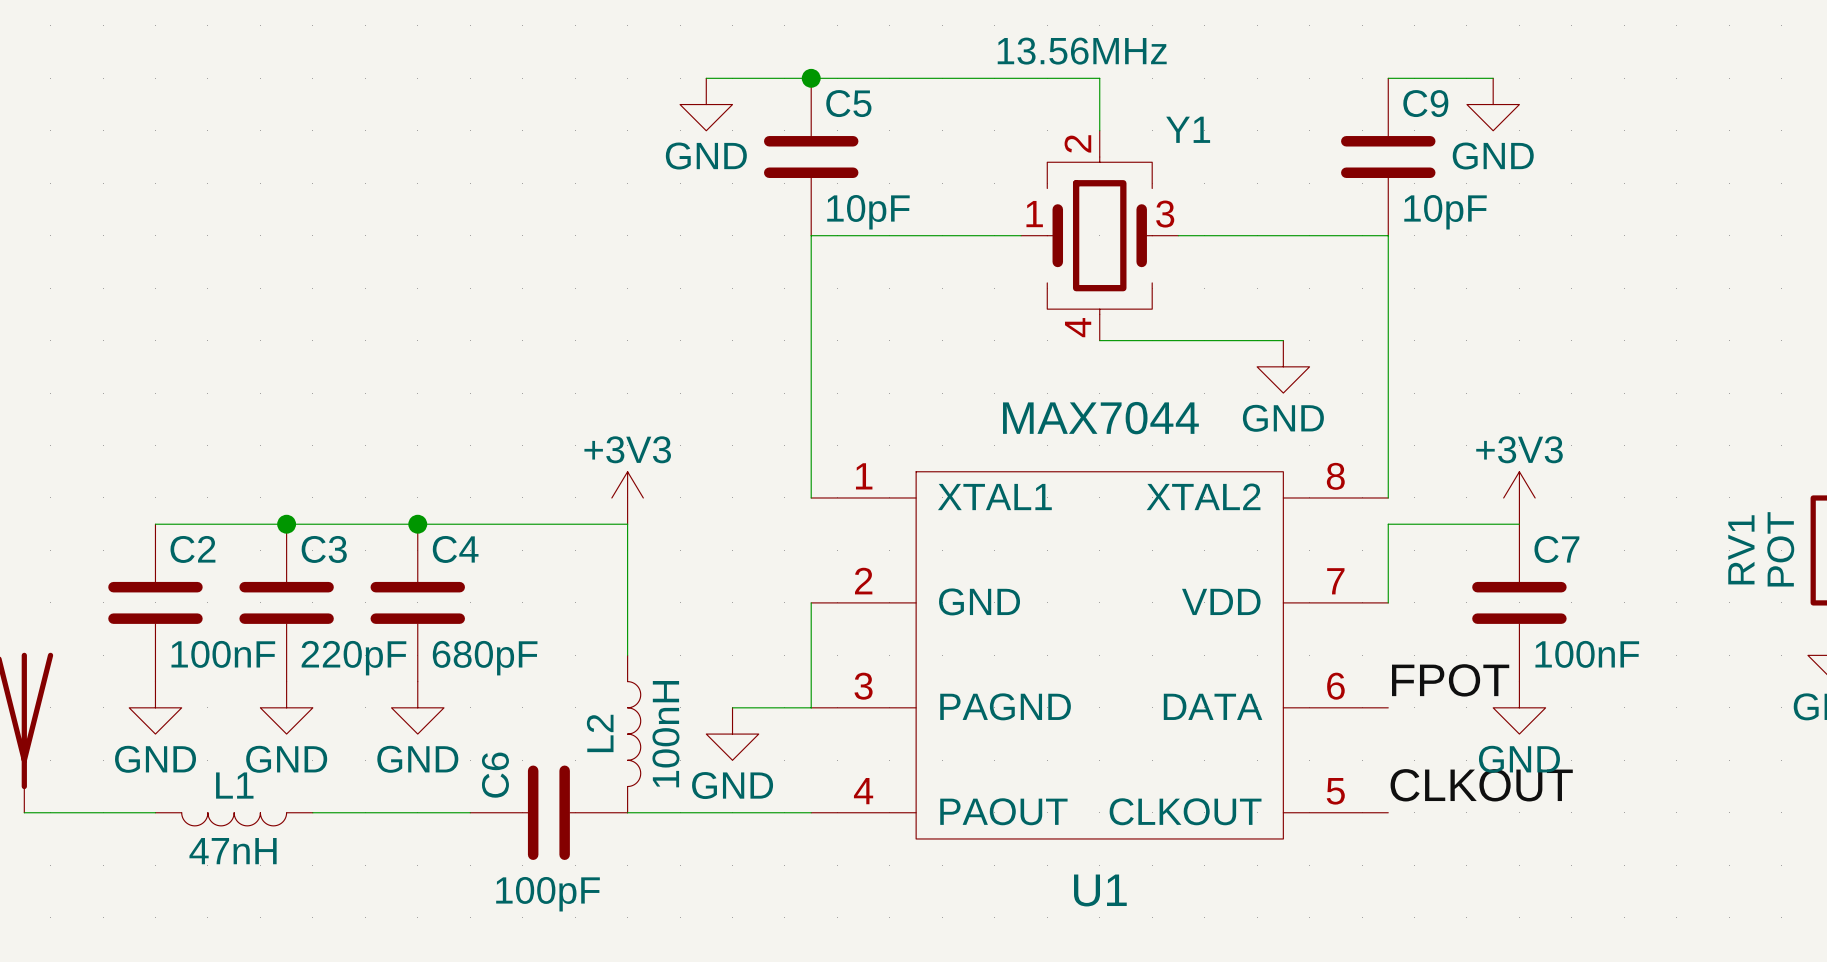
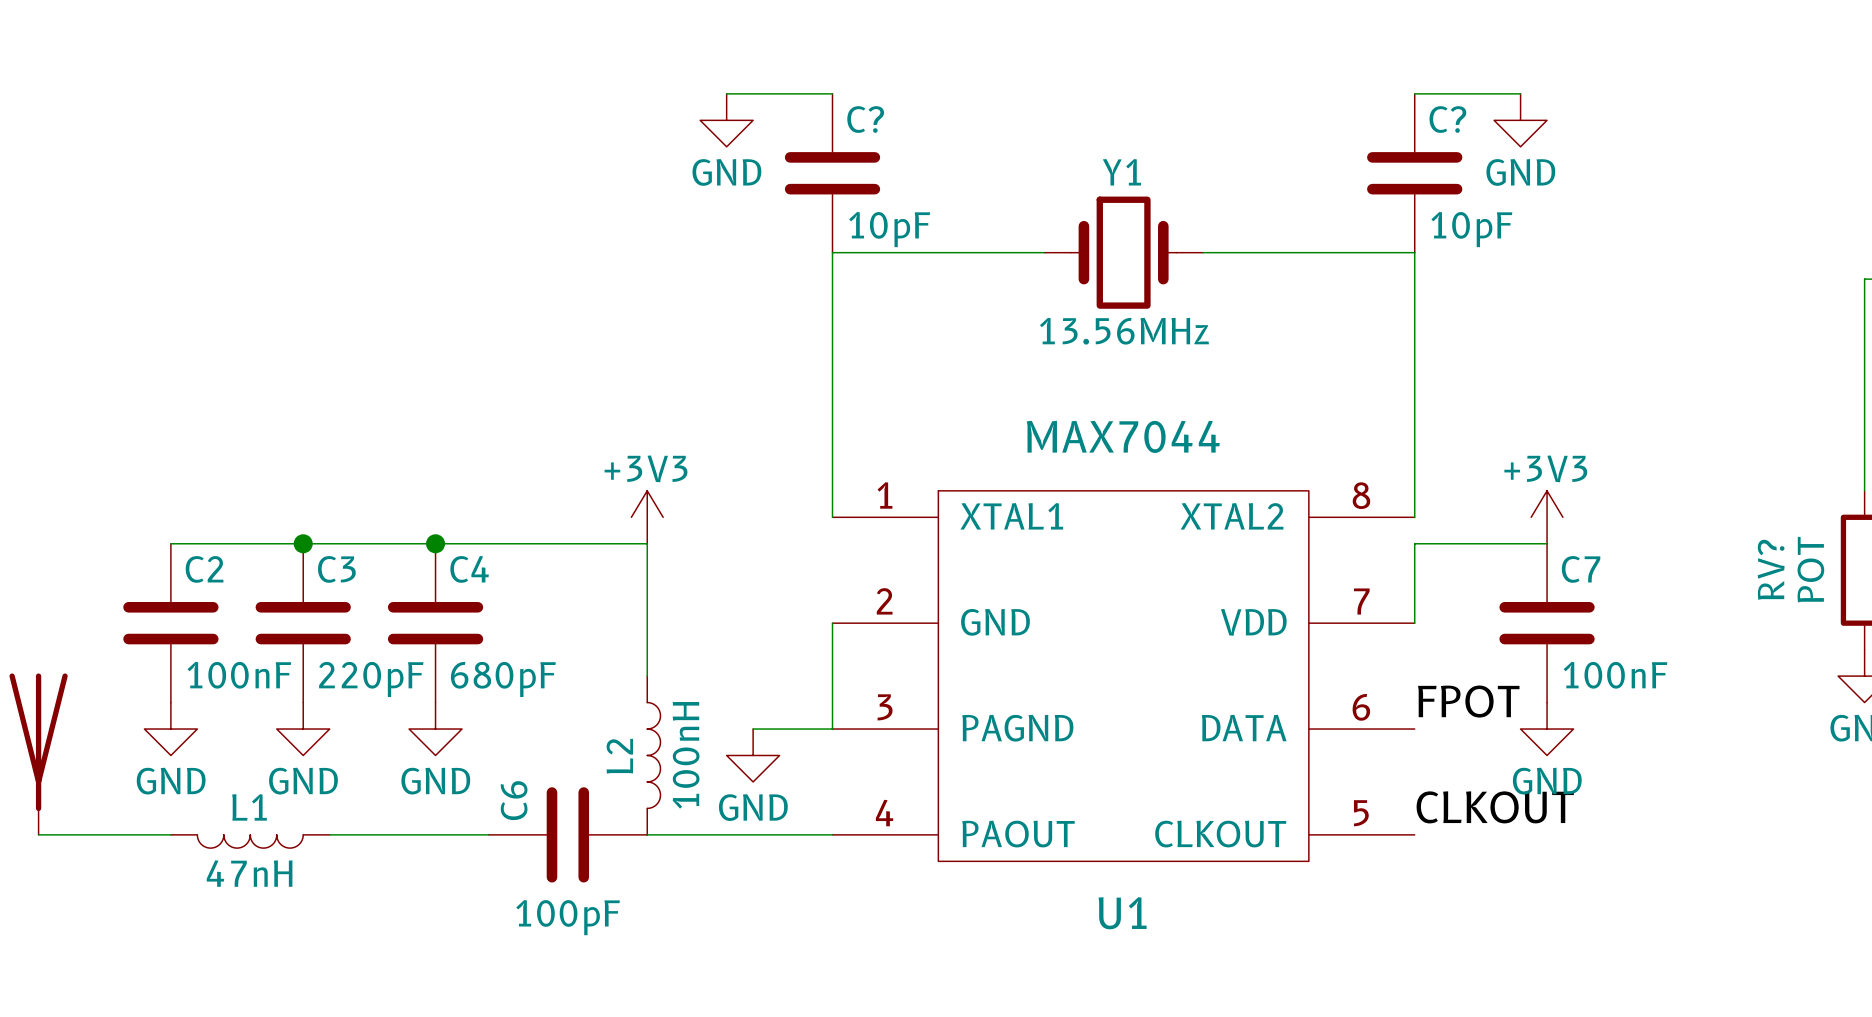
Y1 value position: 13.56MHz (1082, 51) -> 13.56MHz (1124, 331)
wire: (811, 78) (1099, 78) (1099, 130) -> none
junction: (811, 78) -> none
C5 name: C5 (848, 103) -> C? (865, 119)
C9 name: C9 (1425, 103) -> C? (1447, 119)
Y1 name position: Y1 (1188, 129) -> Y1 (1121, 172)
Y1 symbol: [1021, 130, 1179, 341] -> [1044, 196, 1204, 309]
wire: (1099, 340) (1283, 340) -> none
power symbol: GND (1283, 366) -> none
RV1 name: RV1 (1741, 549) -> RV? (1771, 569)

